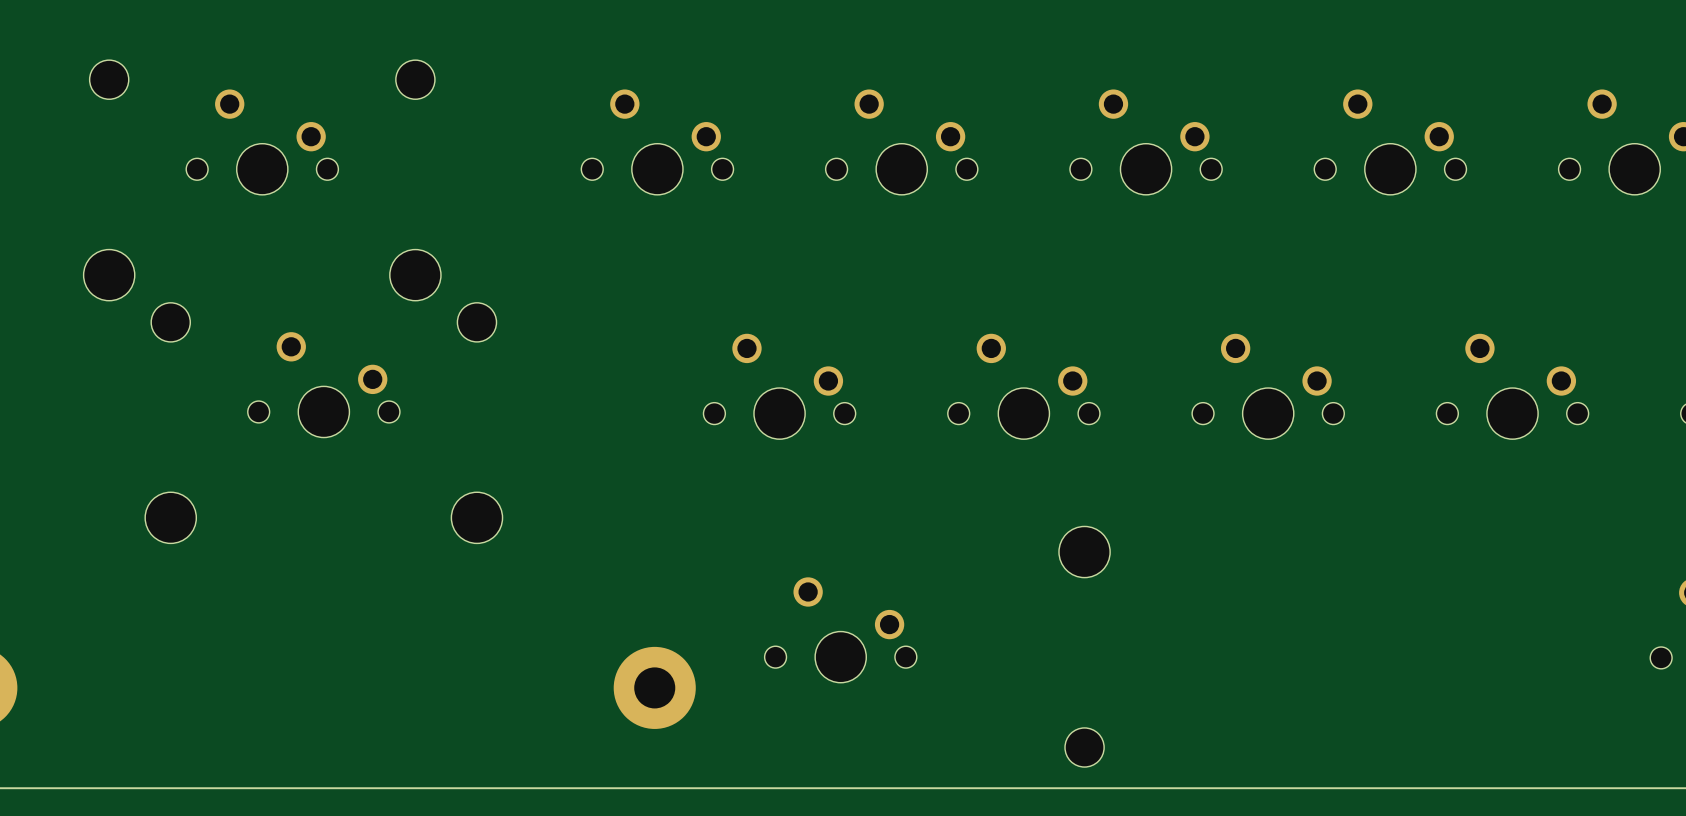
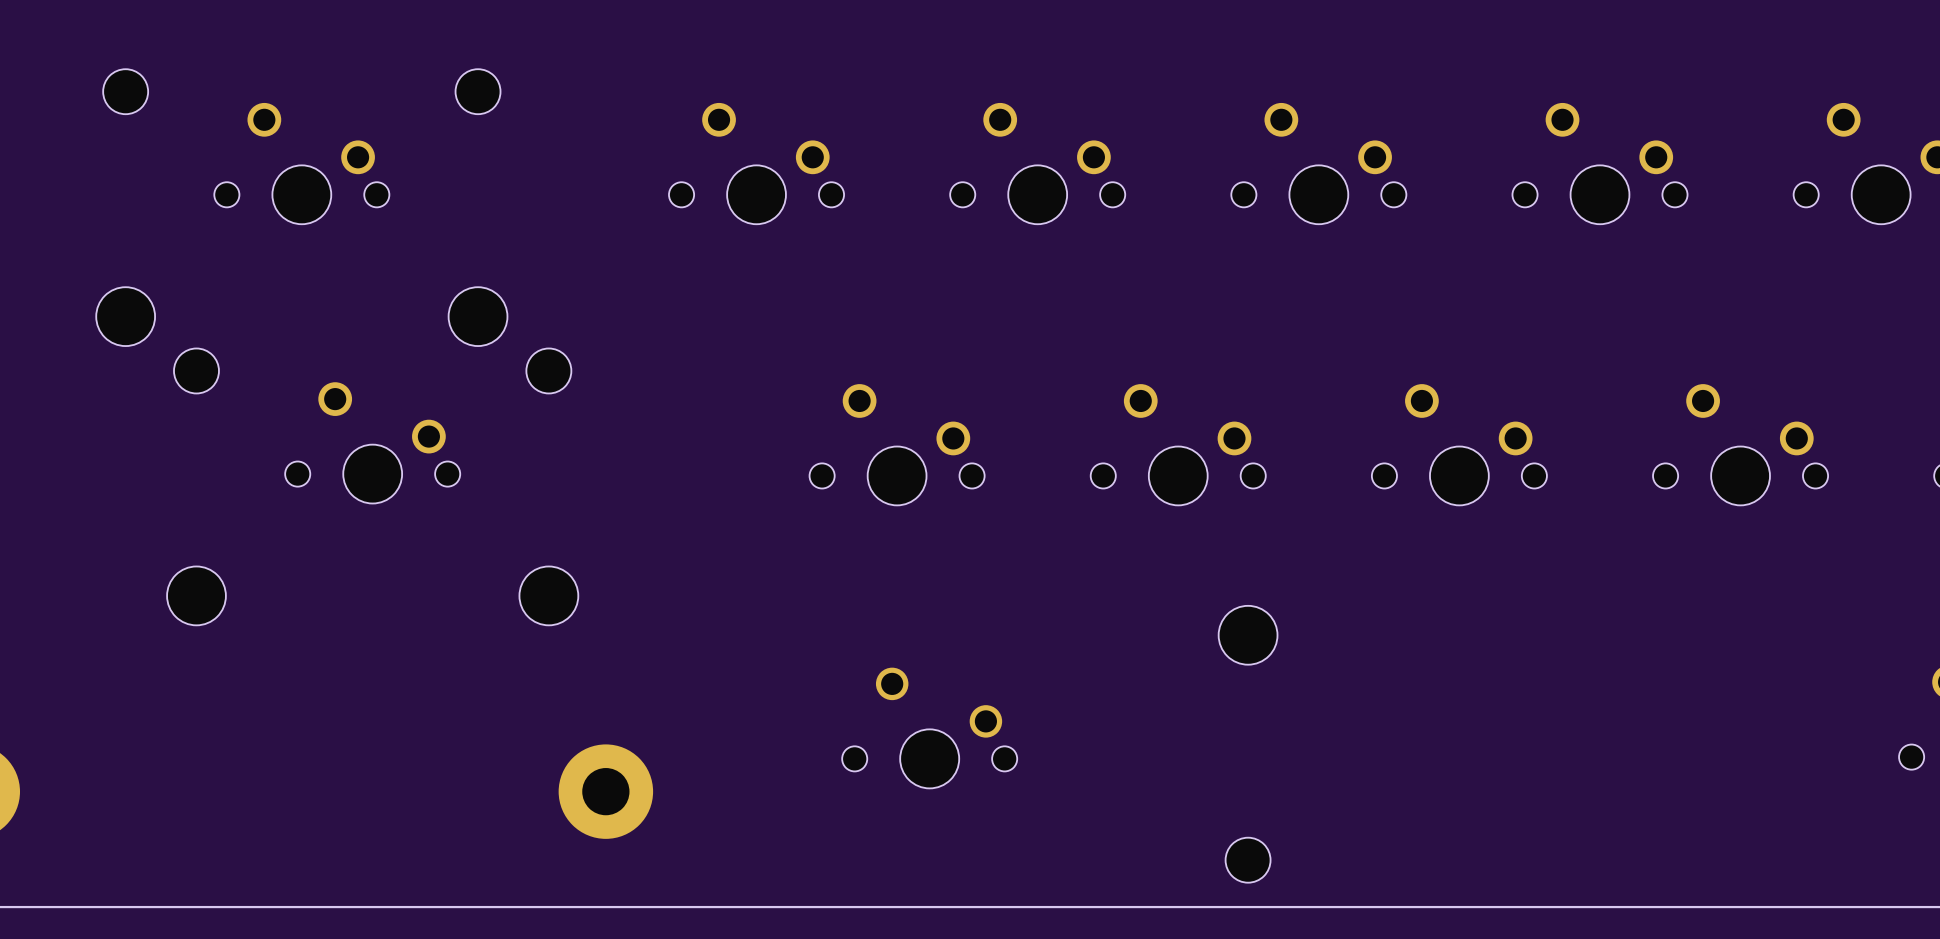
part: (840, 630) -> none
part: none -> (929, 728)
part position: (654, 687) -> (605, 791)

